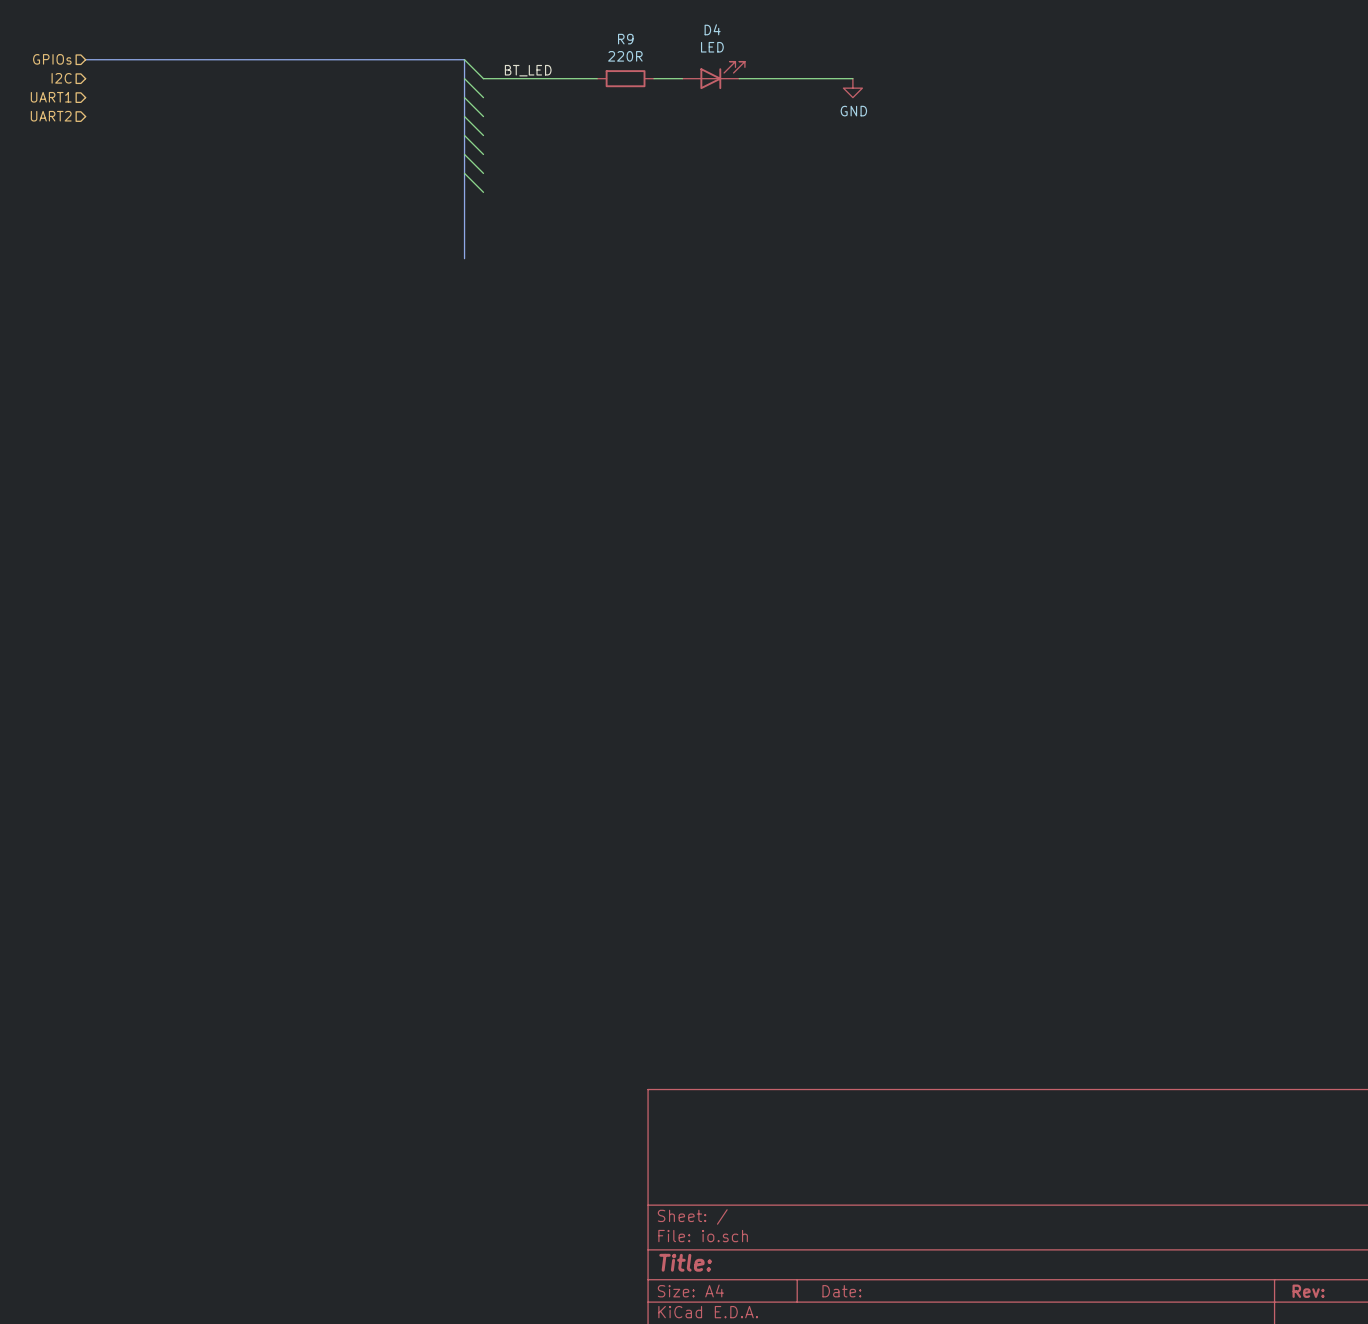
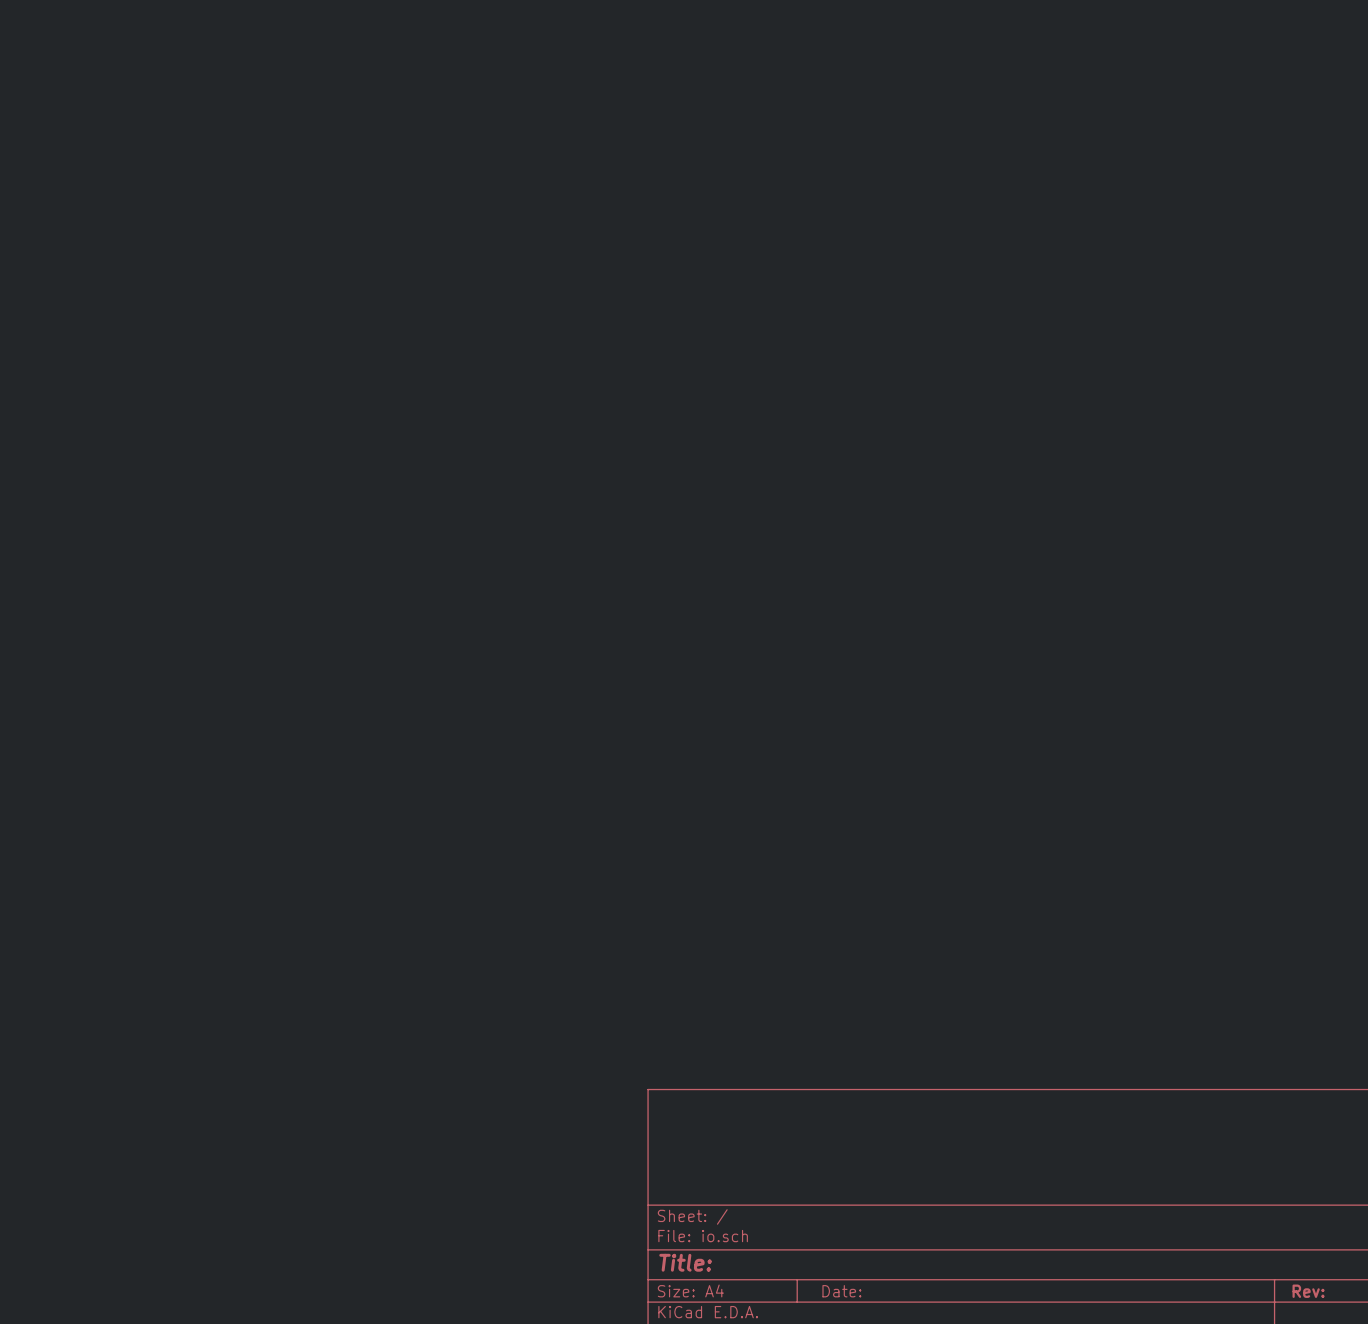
hierarchical label: GPIOs (52, 59) -> none
bus: (85, 59) (464, 59) (464, 258) -> none
wire: (464, 59) (483, 78) (597, 78) -> none
label: BT_LED (528, 70) -> none
D4: LED (713, 75) -> none
hierarchical label: I2C (61, 78) -> none
wire: (464, 78) (483, 97) -> none
R9: 220R (625, 78) -> none
wire: (653, 78) (682, 78) -> none
wire: (739, 78) (852, 78) -> none
power symbol: GND (852, 88) -> none
hierarchical label: UART1 (51, 97) -> none
wire: (464, 97) (483, 116) -> none
hierarchical label: UART2 (51, 116) -> none
wire: (464, 116) (483, 135) -> none
wire: (464, 135) (483, 154) -> none
wire: (464, 154) (483, 173) -> none
wire: (464, 173) (483, 192) -> none

